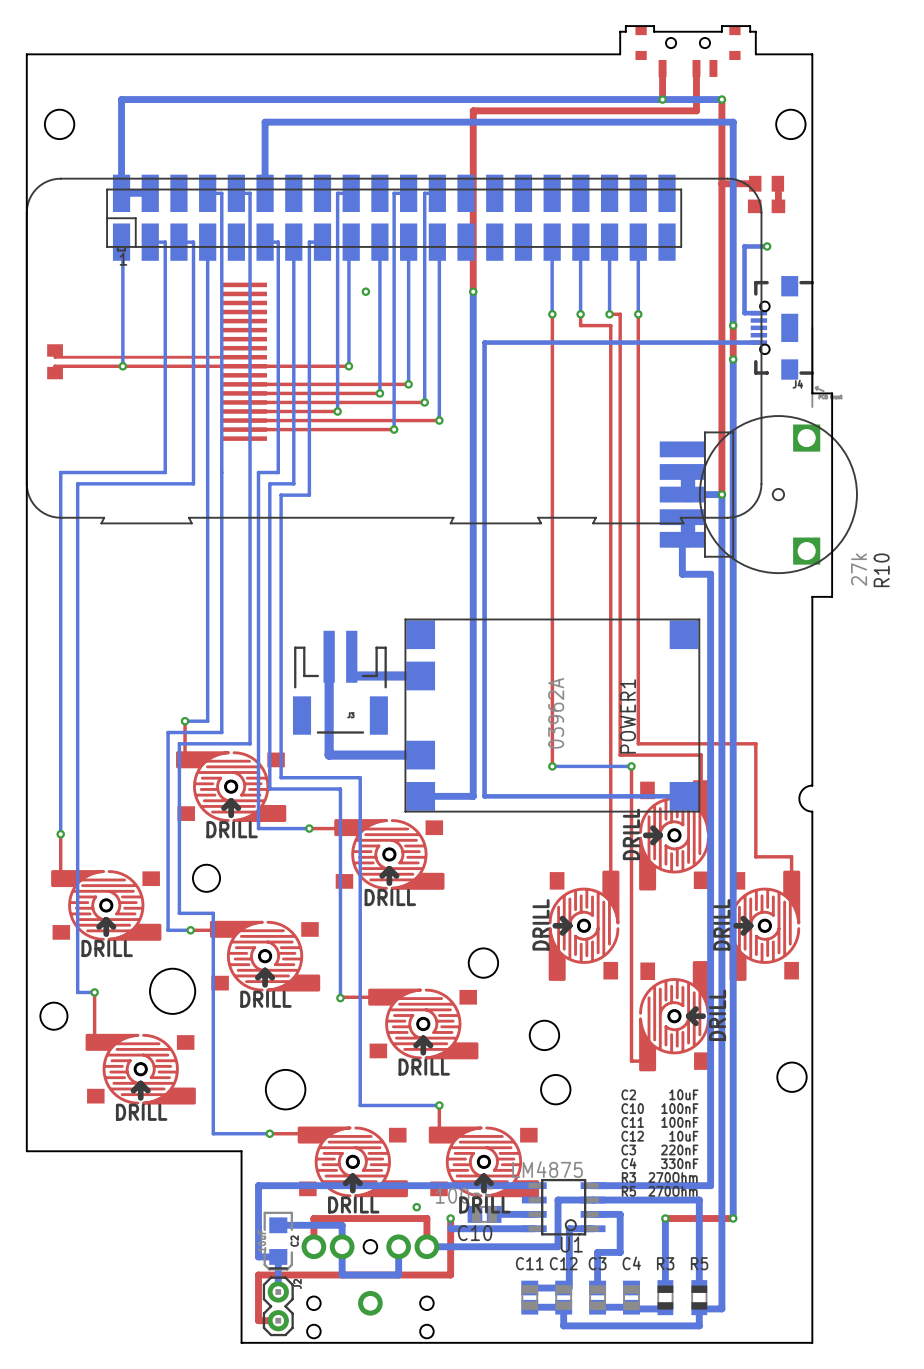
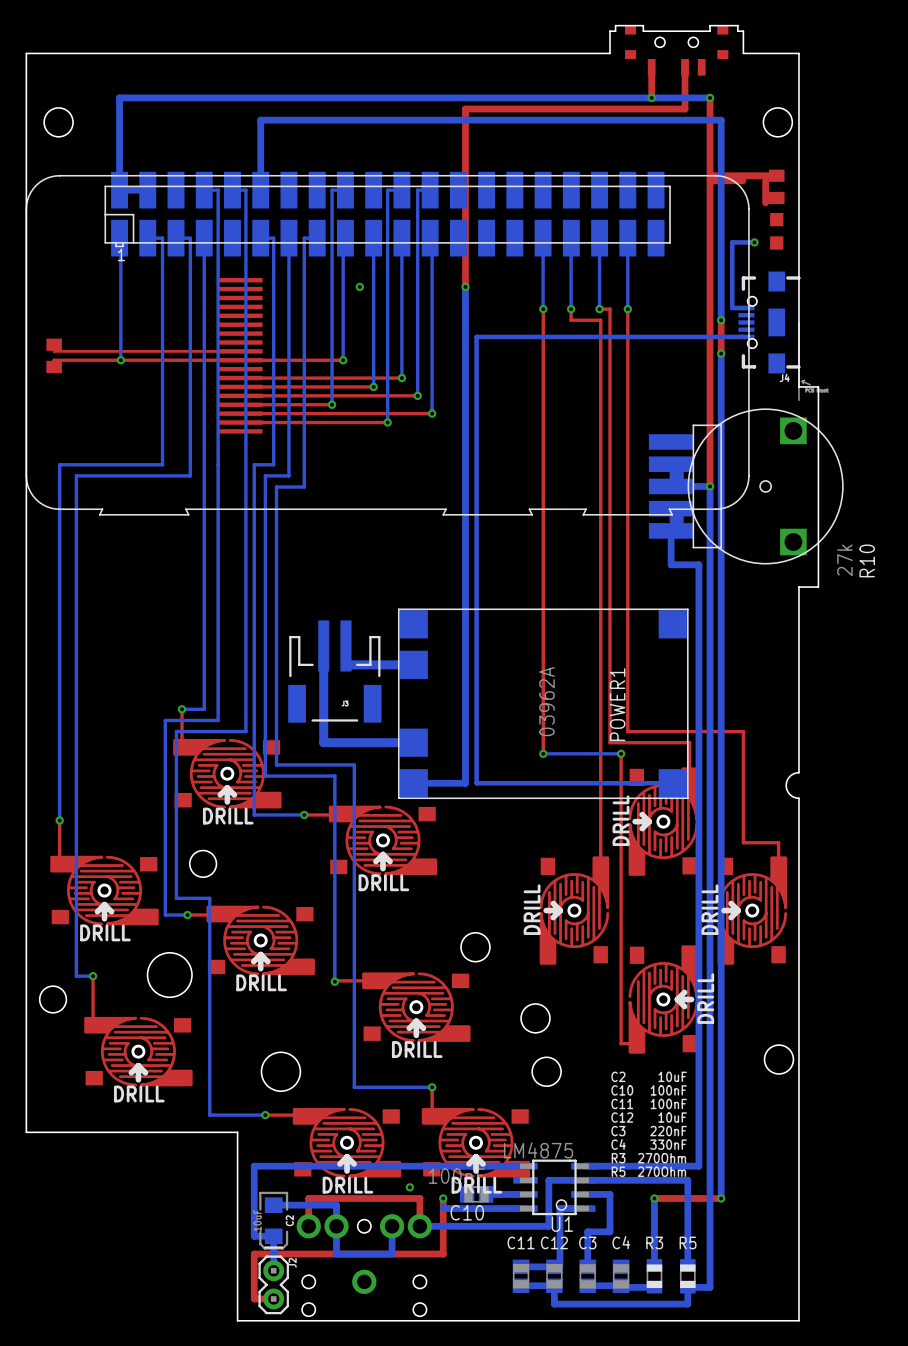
top track: none -> (776, 175) (710, 175)
part rotation: 0° (766, 183) -> 90° clockwise (776, 186)
part position: (766, 183) -> (776, 186)
part rotation: 0° (766, 206) -> 90° clockwise (776, 231)
part position: (766, 206) -> (776, 231)

